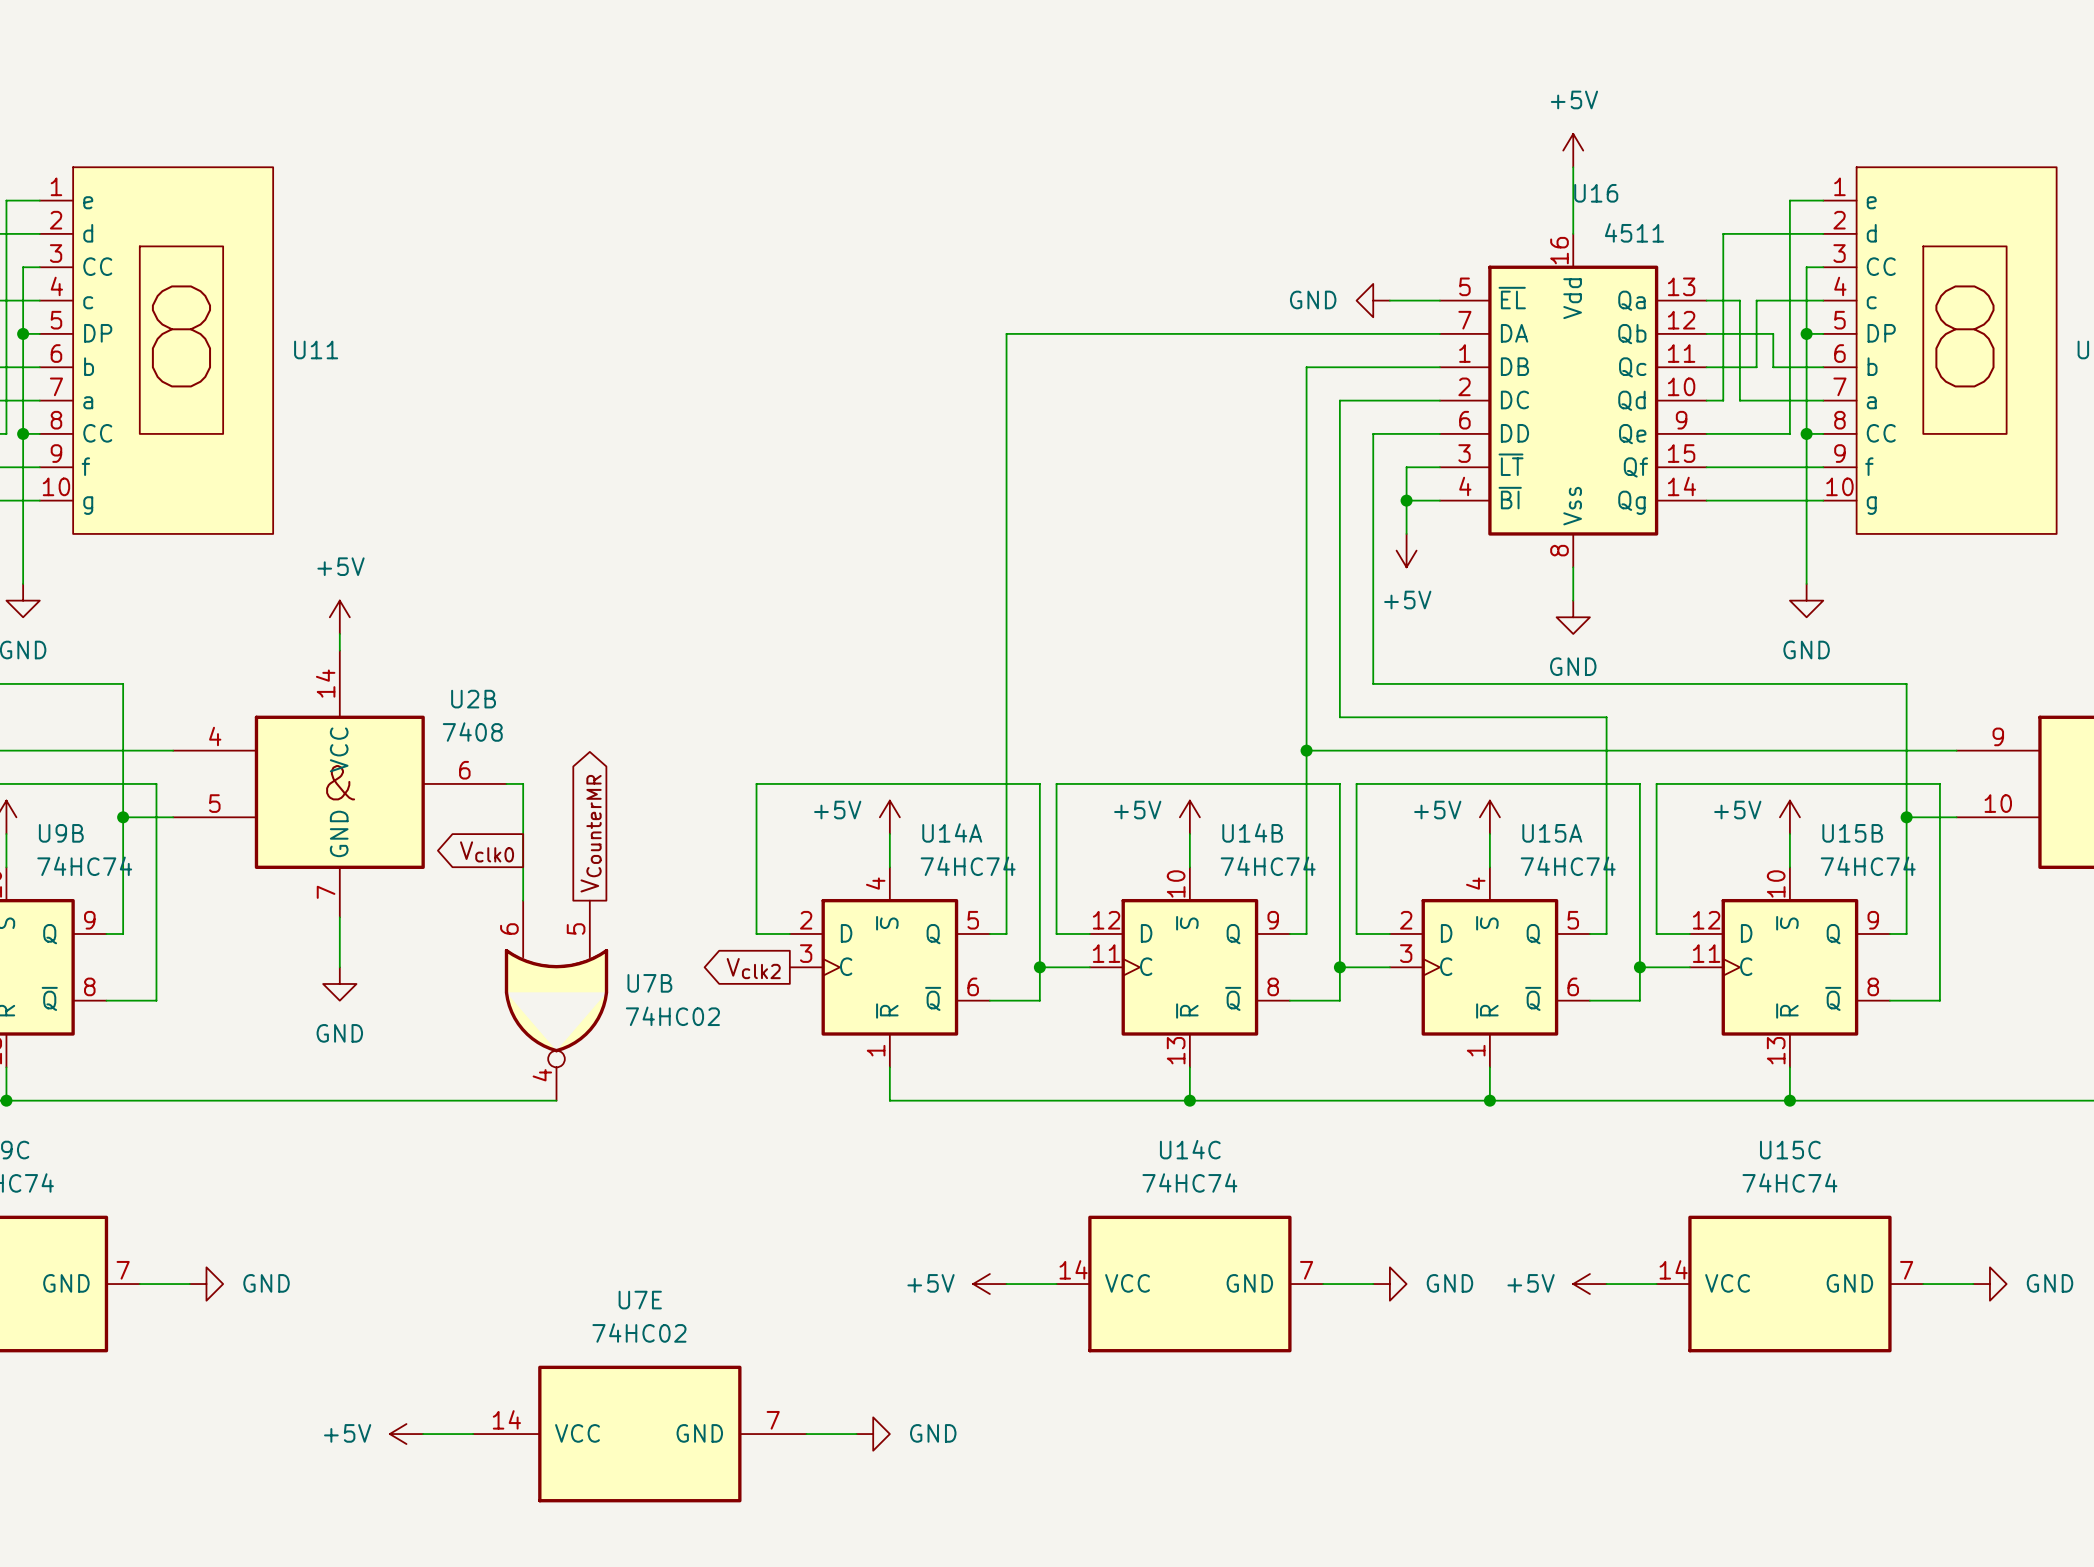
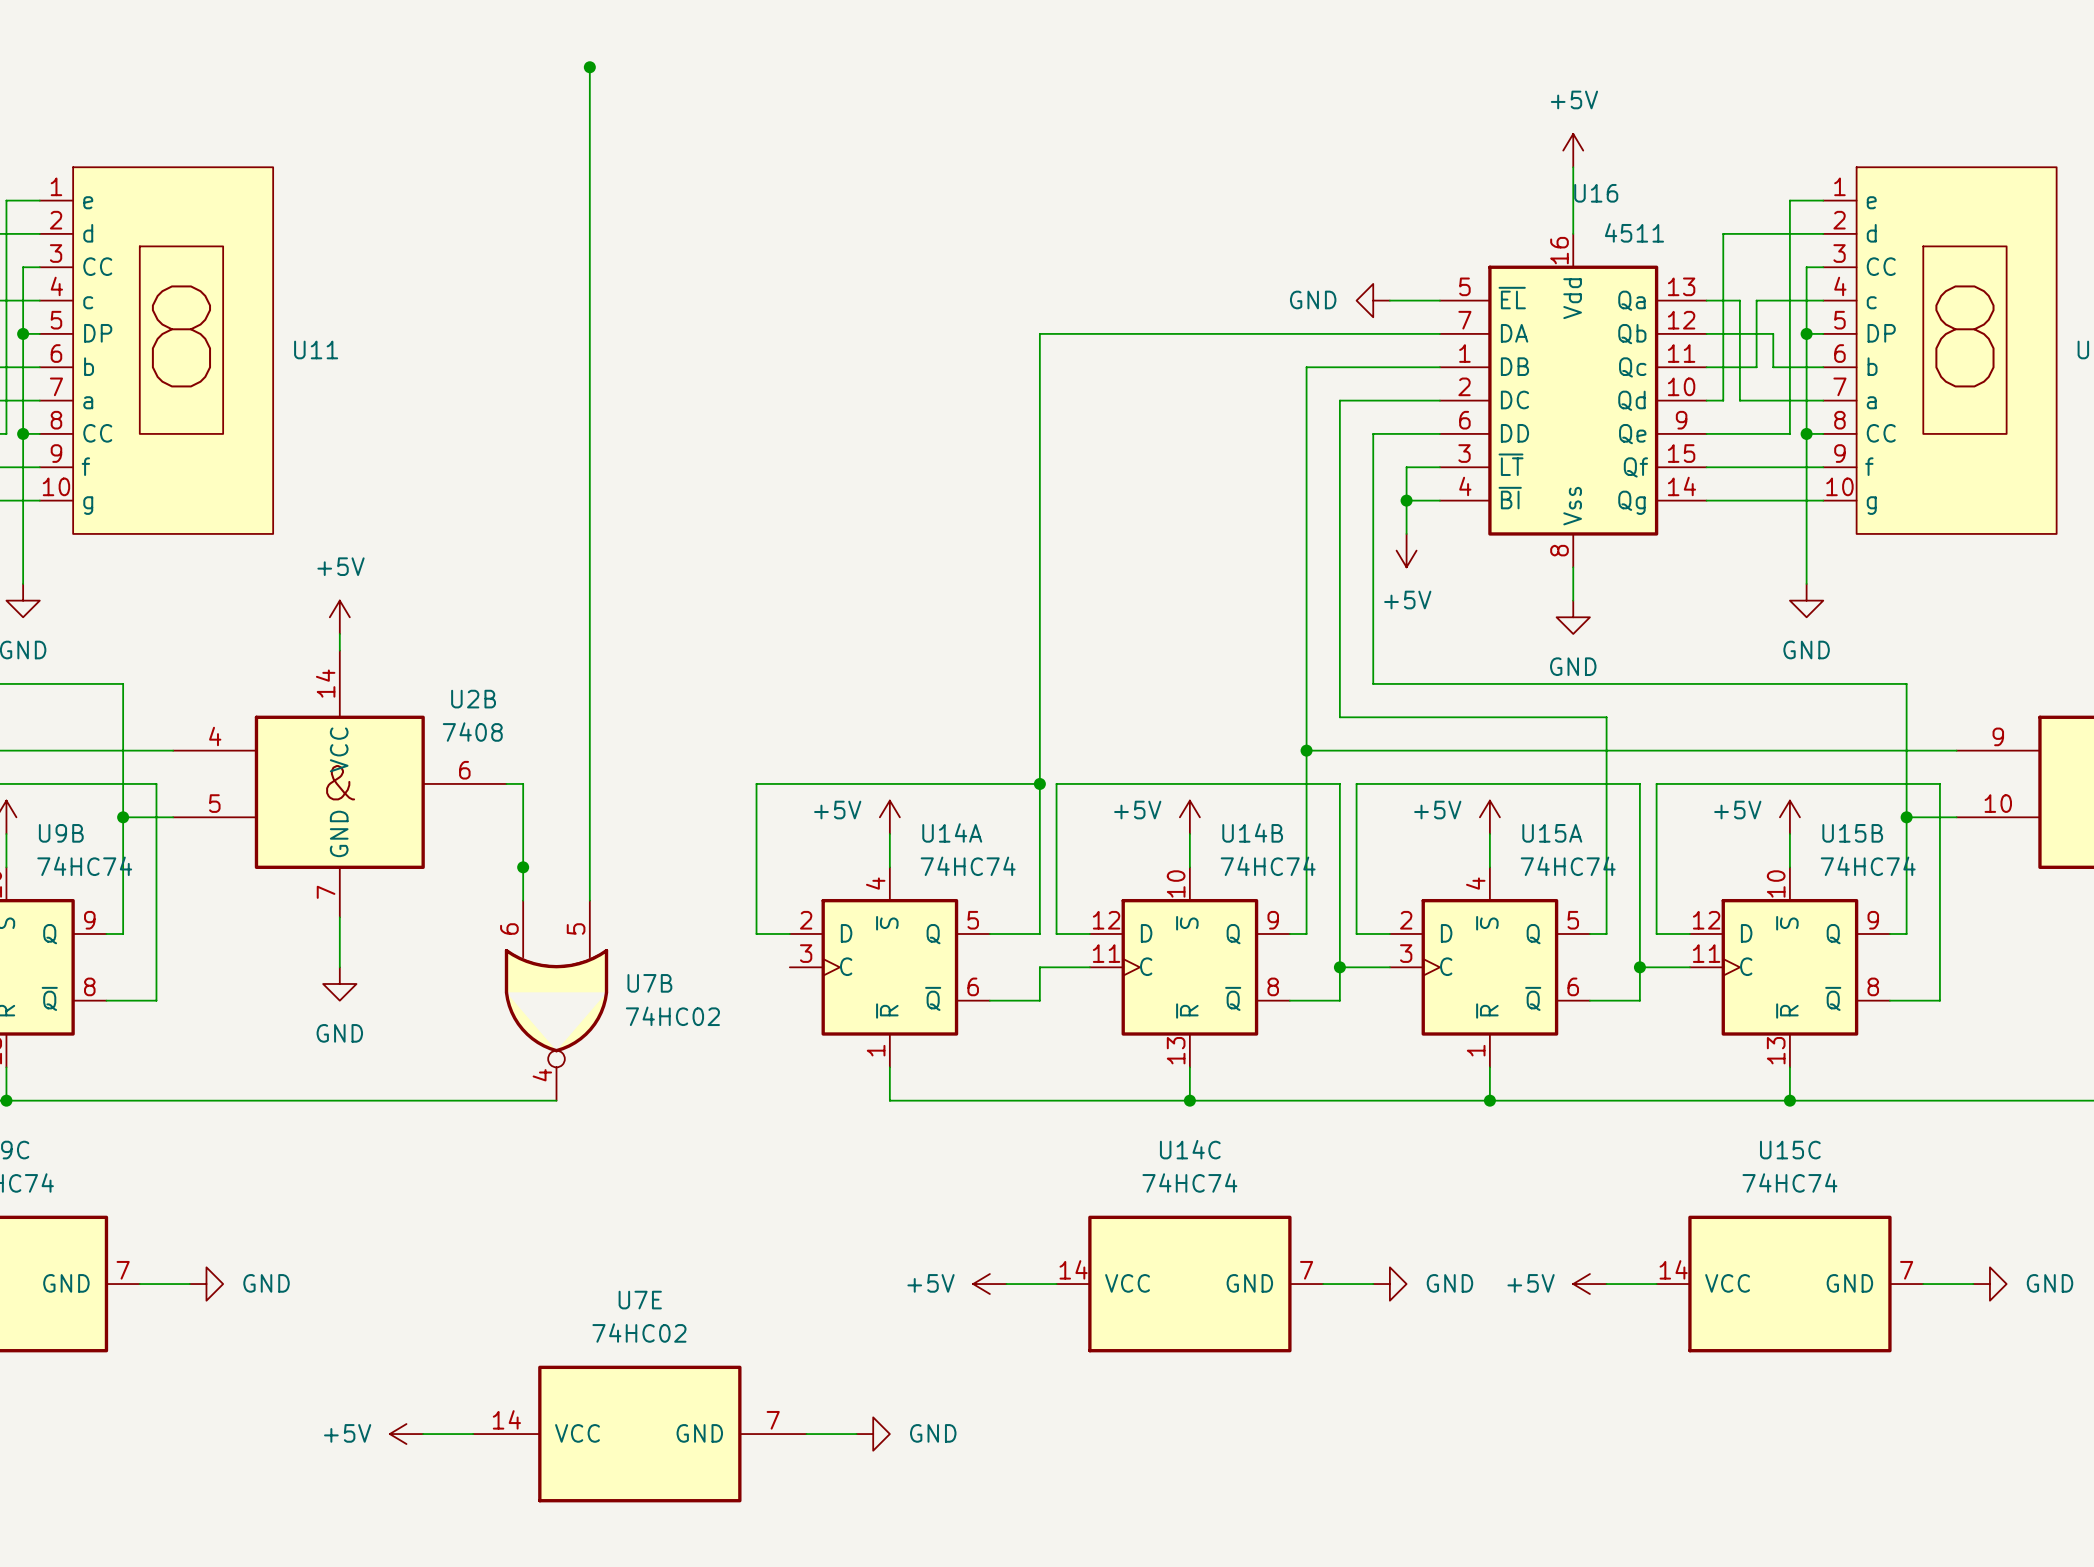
wire: none -> (589, 67) (589, 900)
junction: none -> (589, 67)
wire: (1039, 333) (1006, 333) (1006, 933) -> (1039, 333) (1039, 783)
junction: none -> (1039, 783)
global label: VCounterMR (591, 833) -> none
global label: Vclk0 (487, 851) -> none
junction: none -> (523, 867)
wire: (1039, 933) (1039, 967) -> (1039, 933) (1006, 933)
junction: (1039, 967) -> none
global label: Vclk2 (753, 968) -> none

